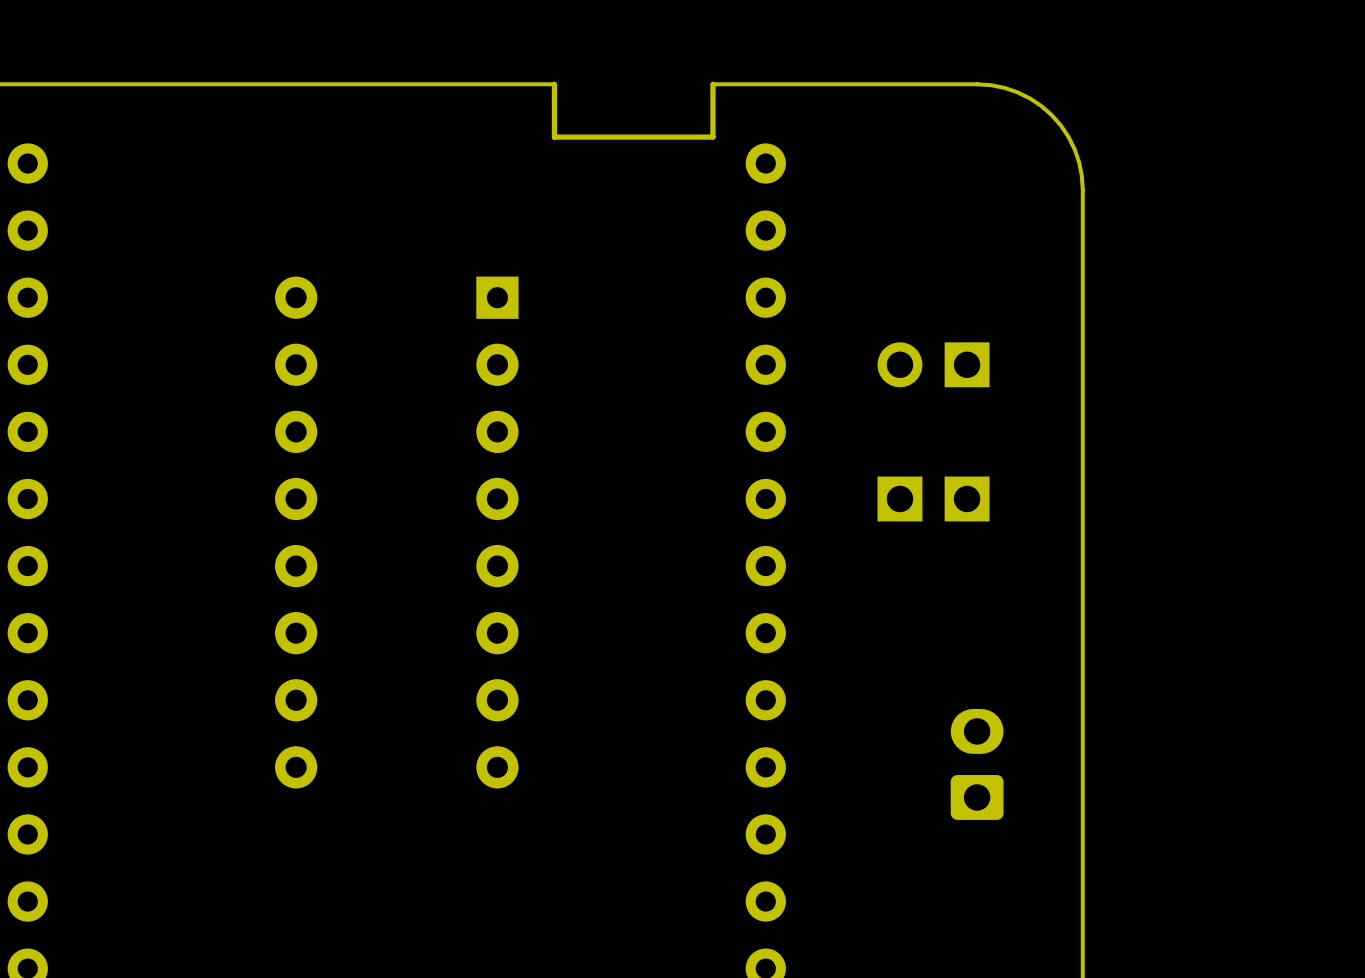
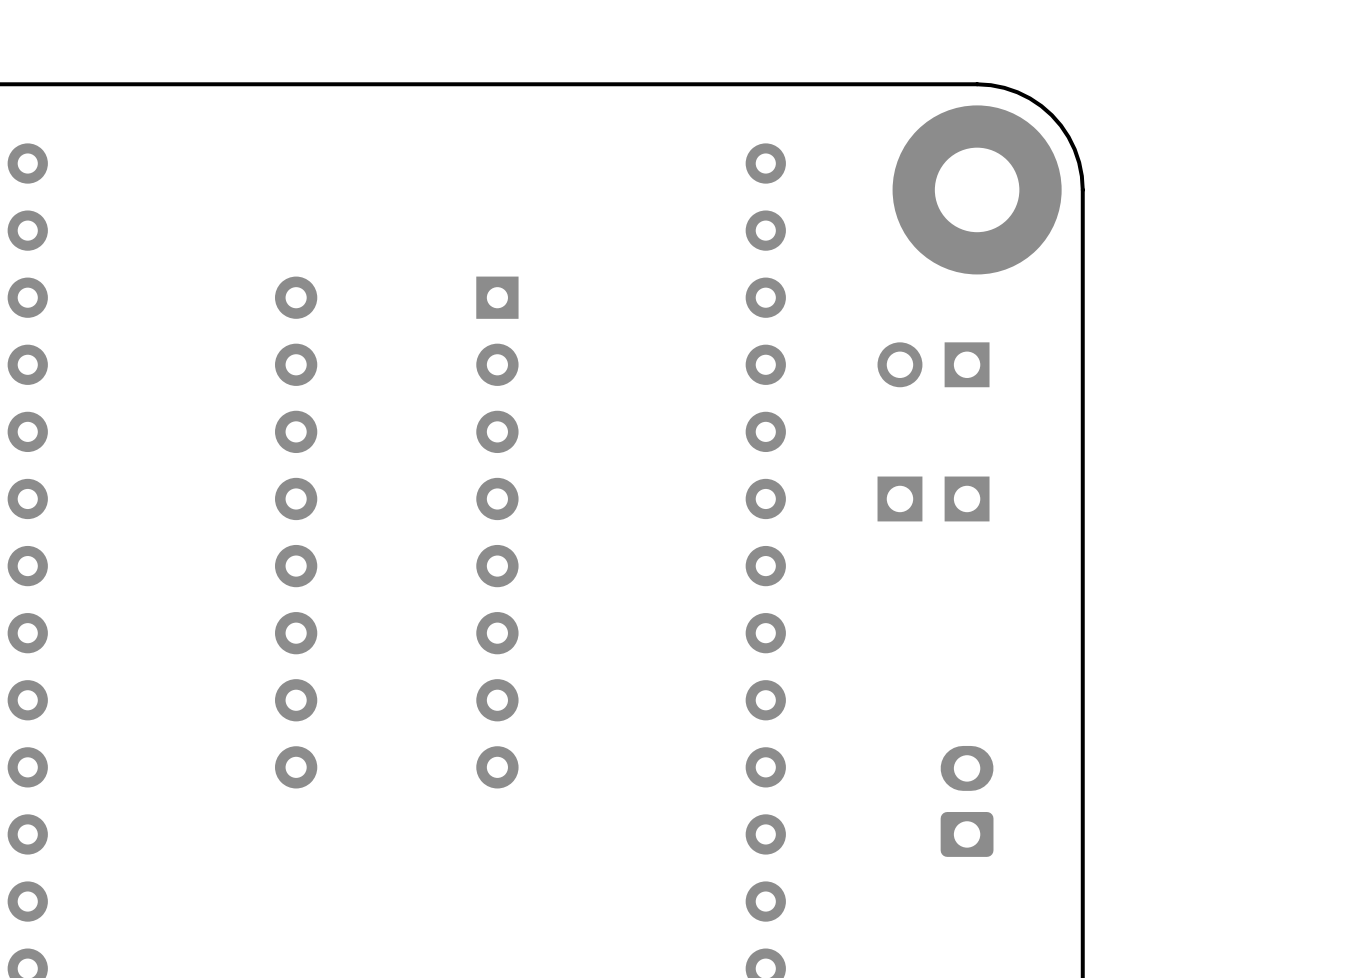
board edge: (712, 84) (712, 137) (554, 137) (554, 84) -> (712, 84) (554, 84)
part: none -> (977, 189)
part position: (977, 764) -> (967, 801)

